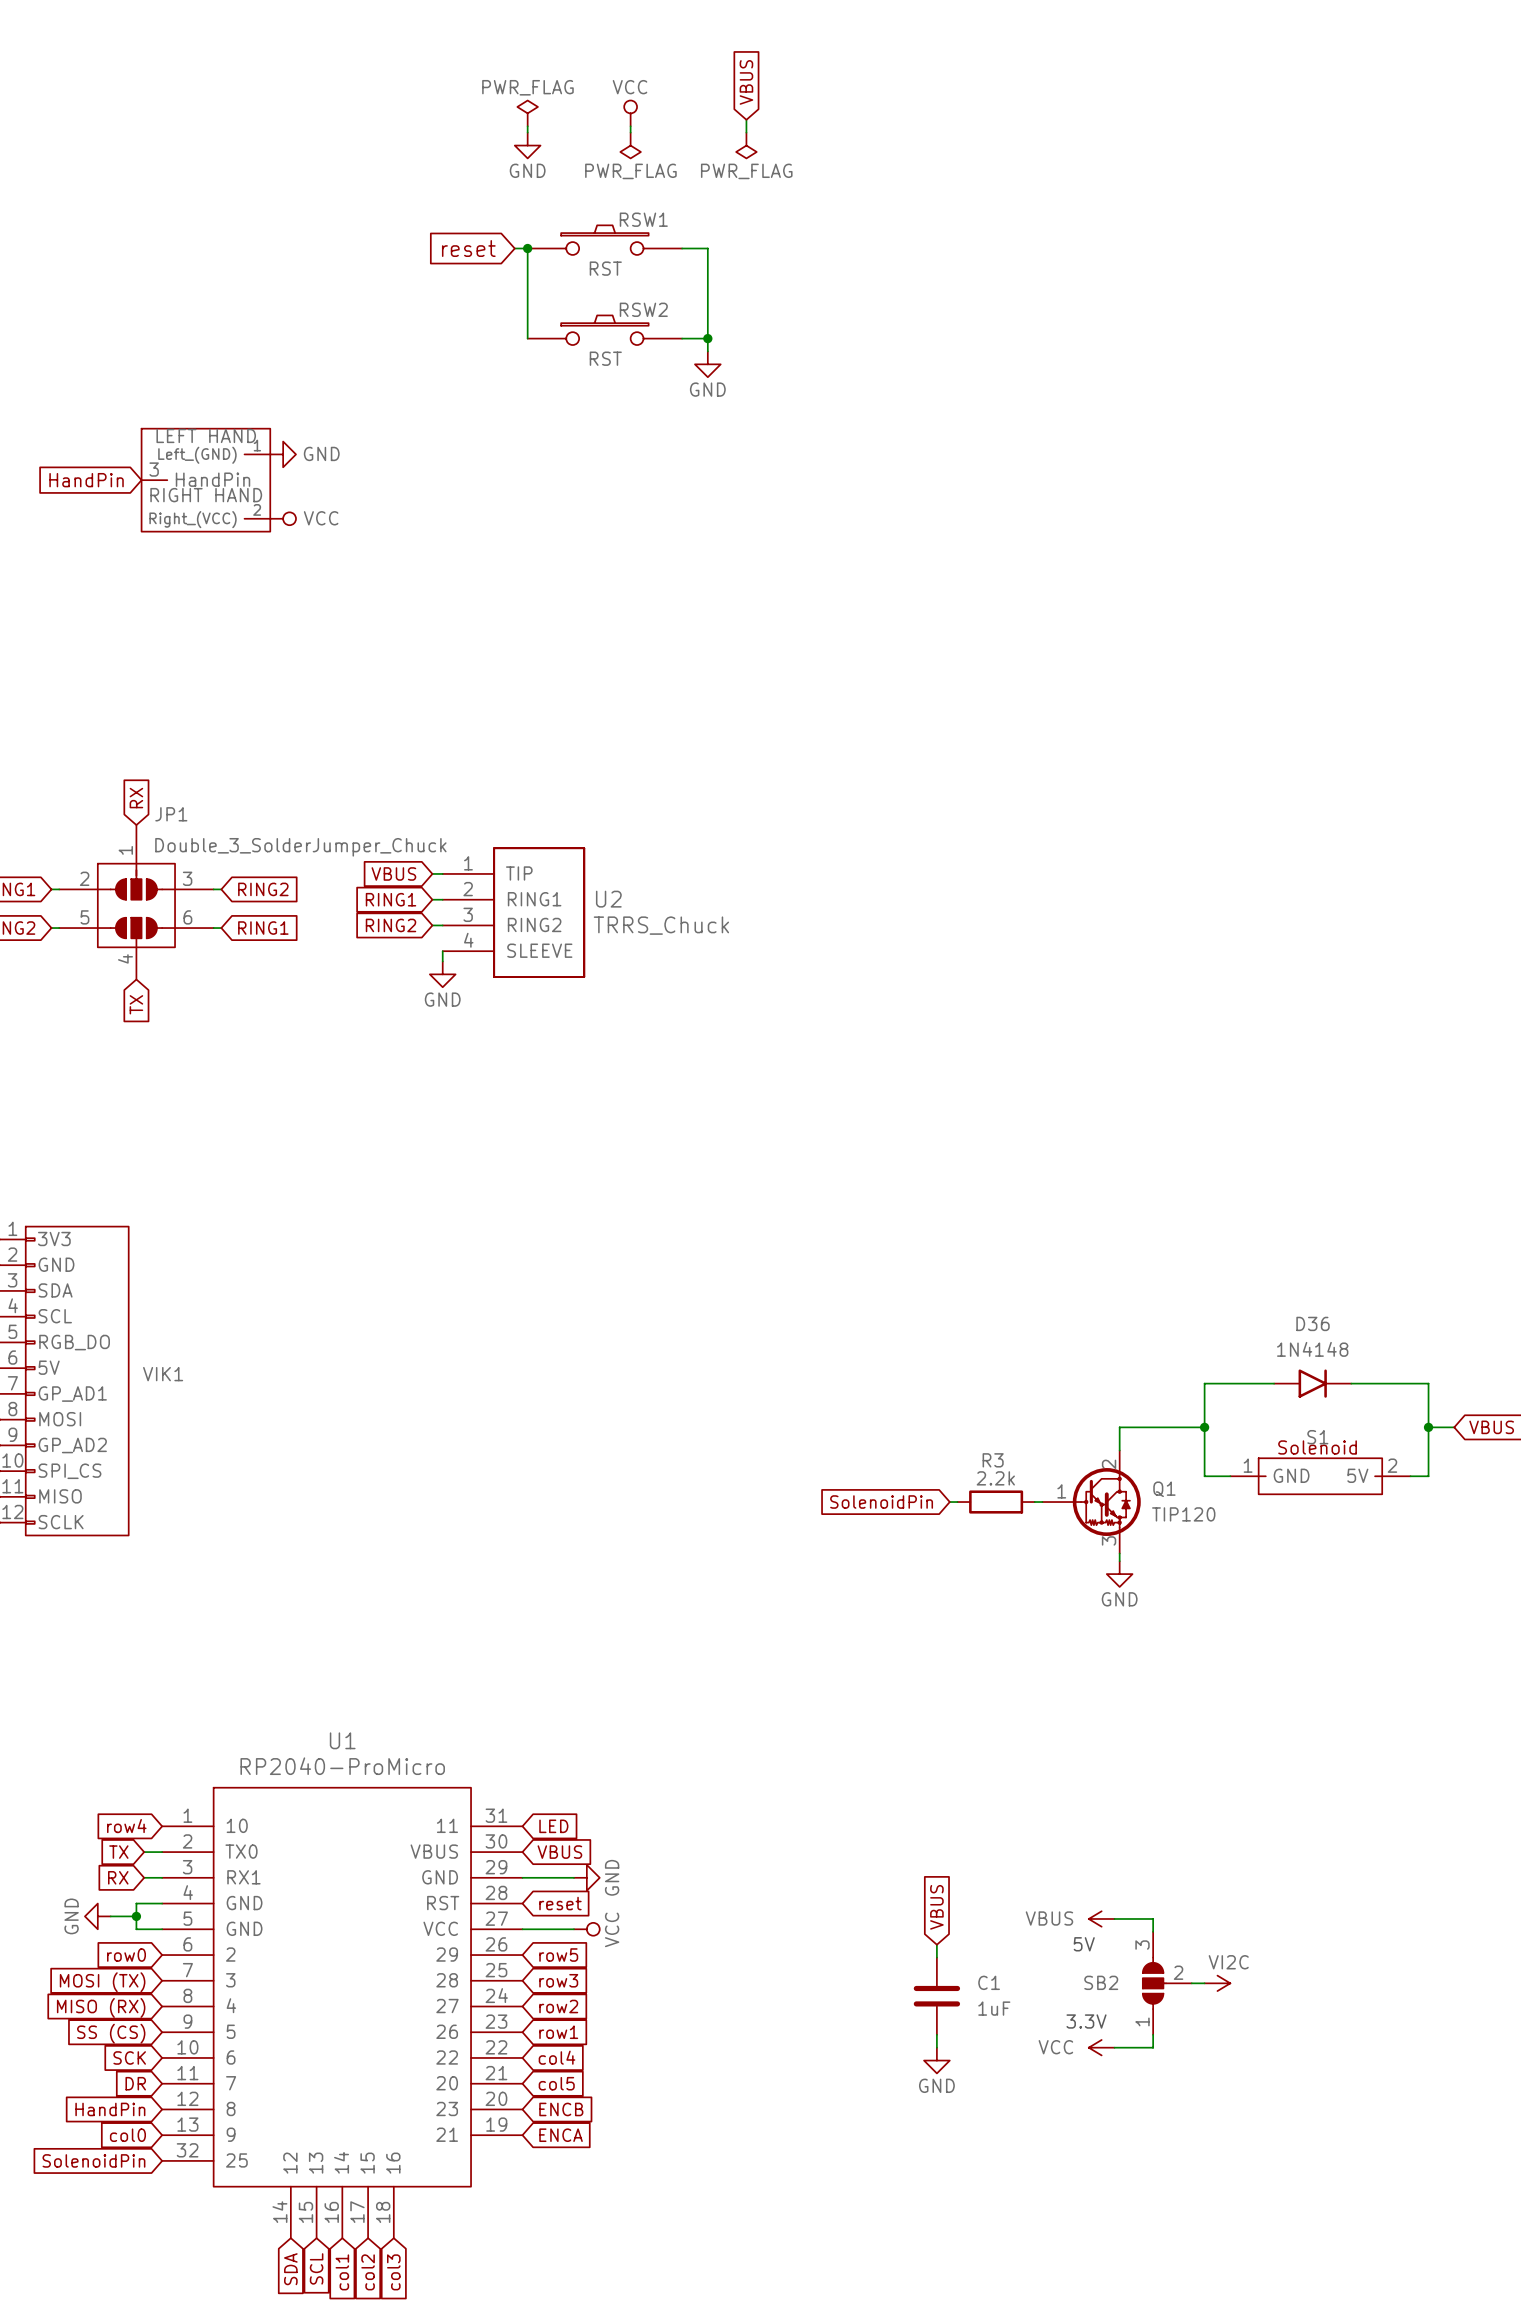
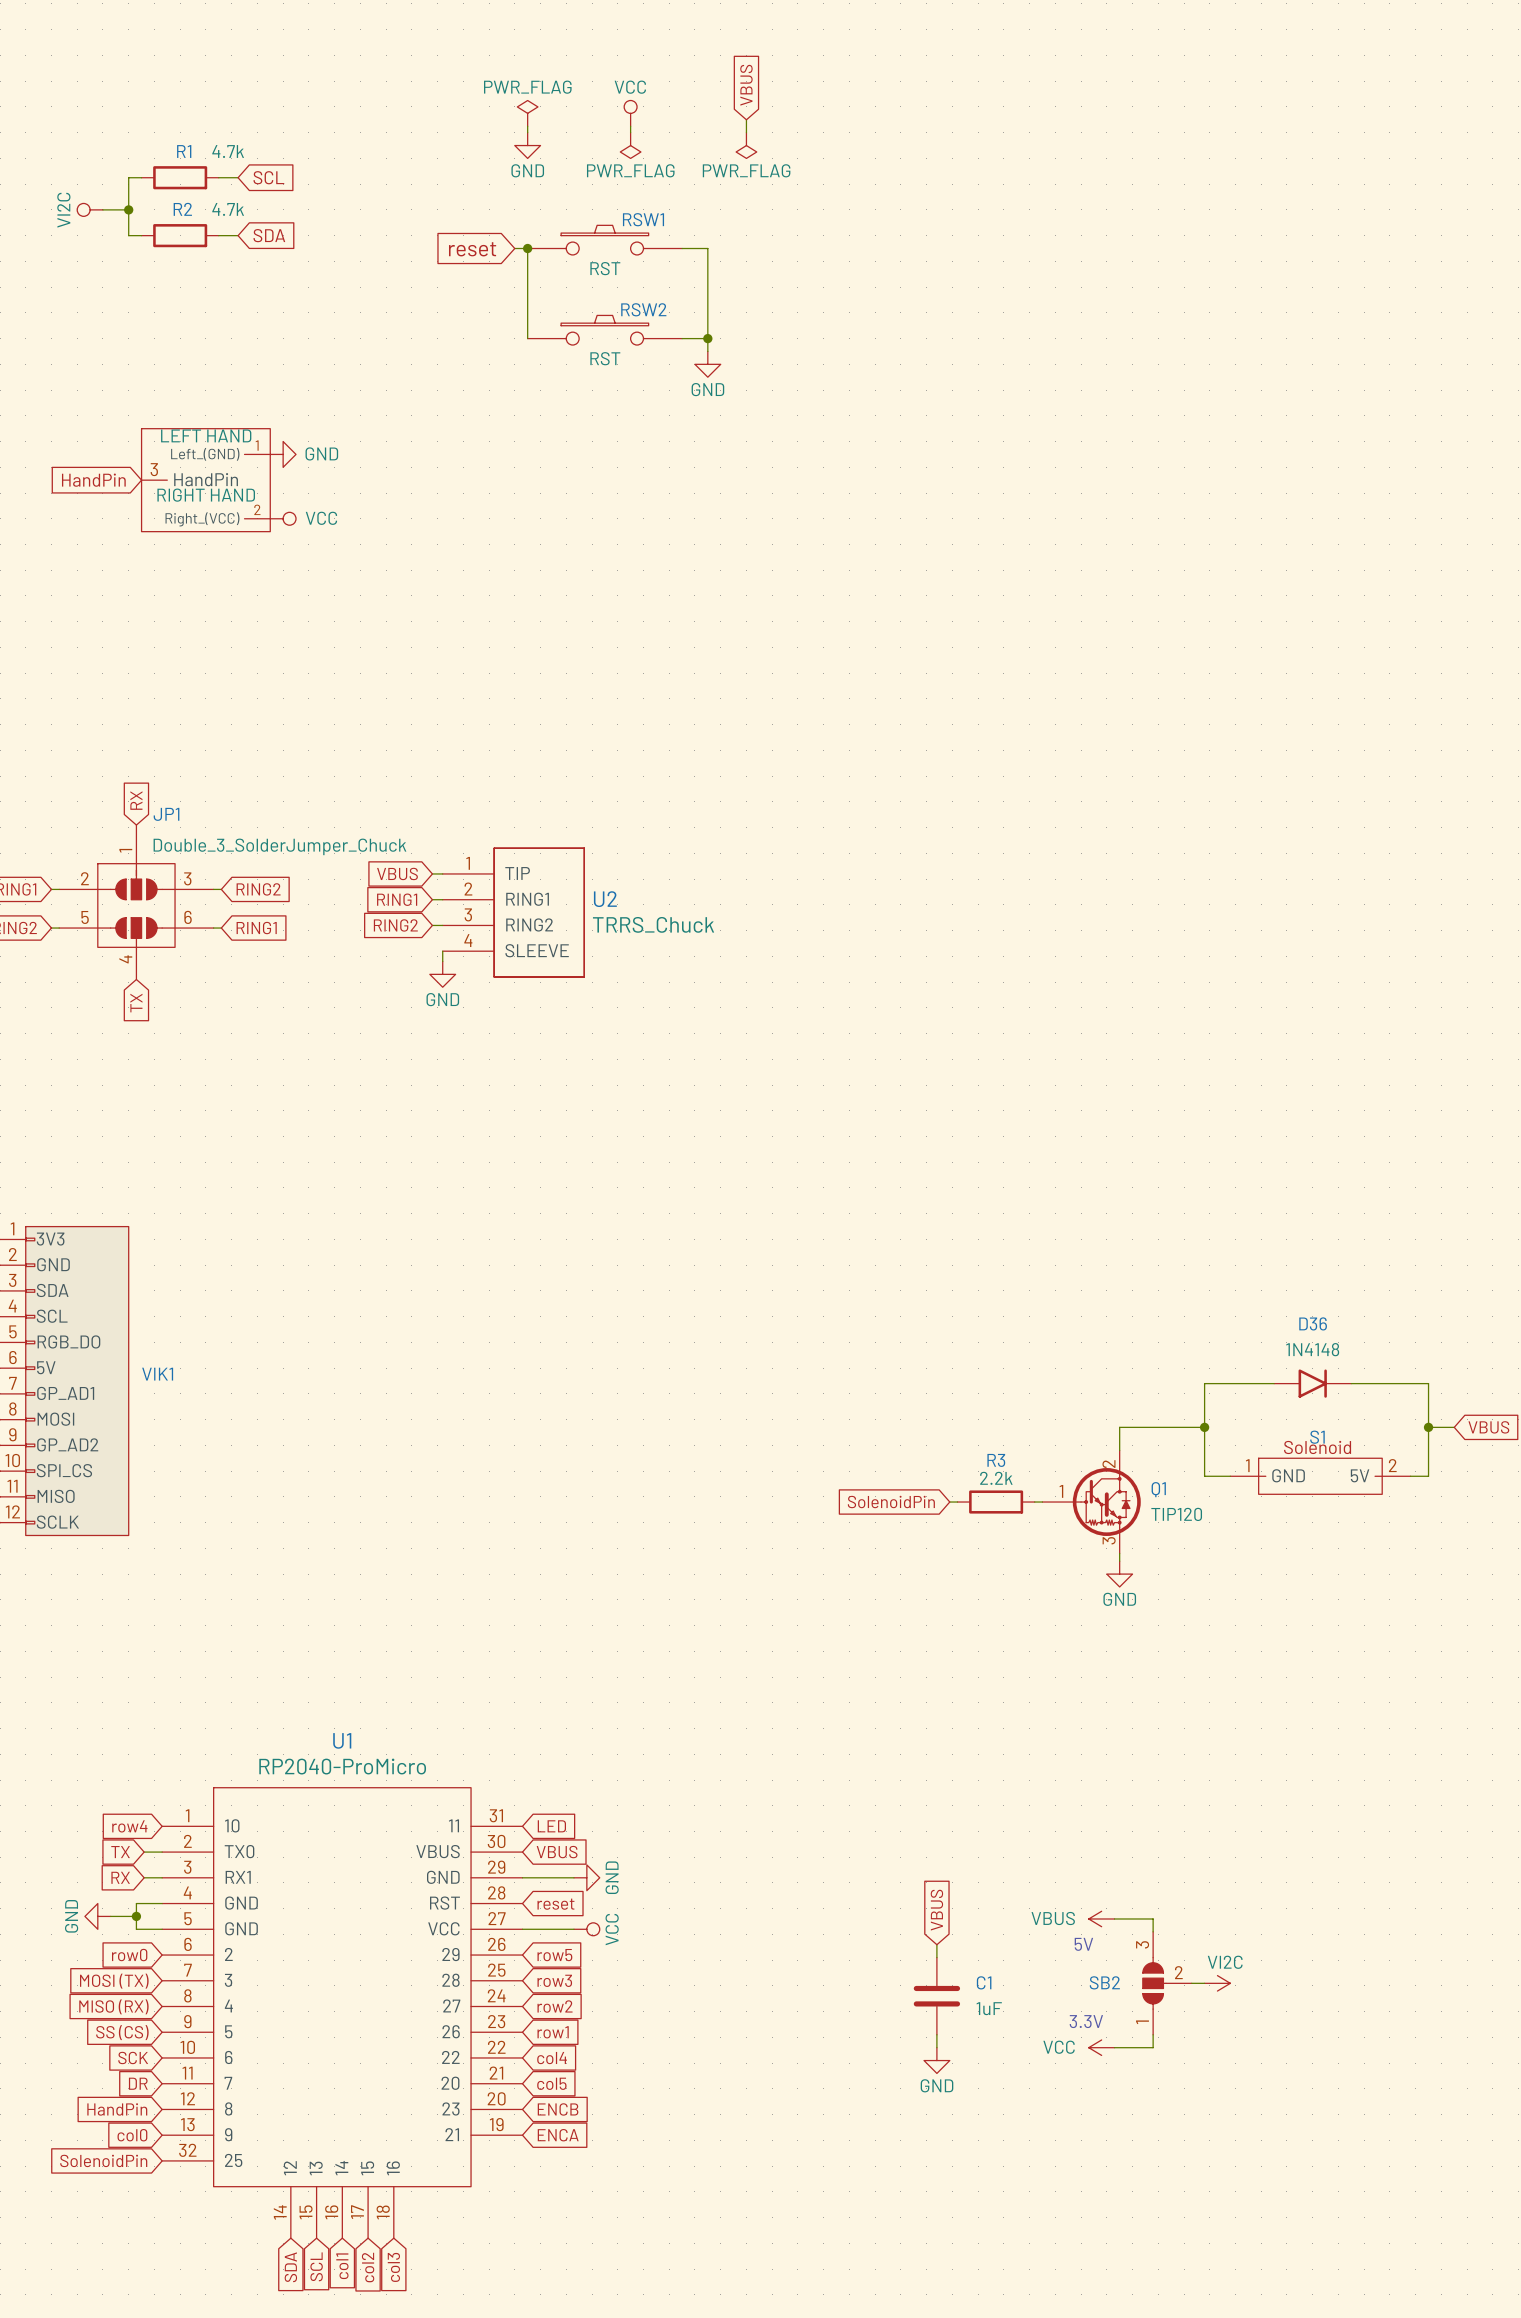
wire: none -> (141, 177) (128, 177) (128, 235) (141, 235)
R1: none -> 4.7k (180, 177)
wire: none -> (218, 177) (238, 177)
global label: none -> SCL (268, 177)
power symbol: none -> VI2C (90, 209)
wire: none -> (102, 209) (128, 209)
junction: none -> (128, 209)
R2: none -> 4.7k (180, 235)
wire: none -> (218, 235) (238, 235)
global label: none -> SDA (269, 235)

